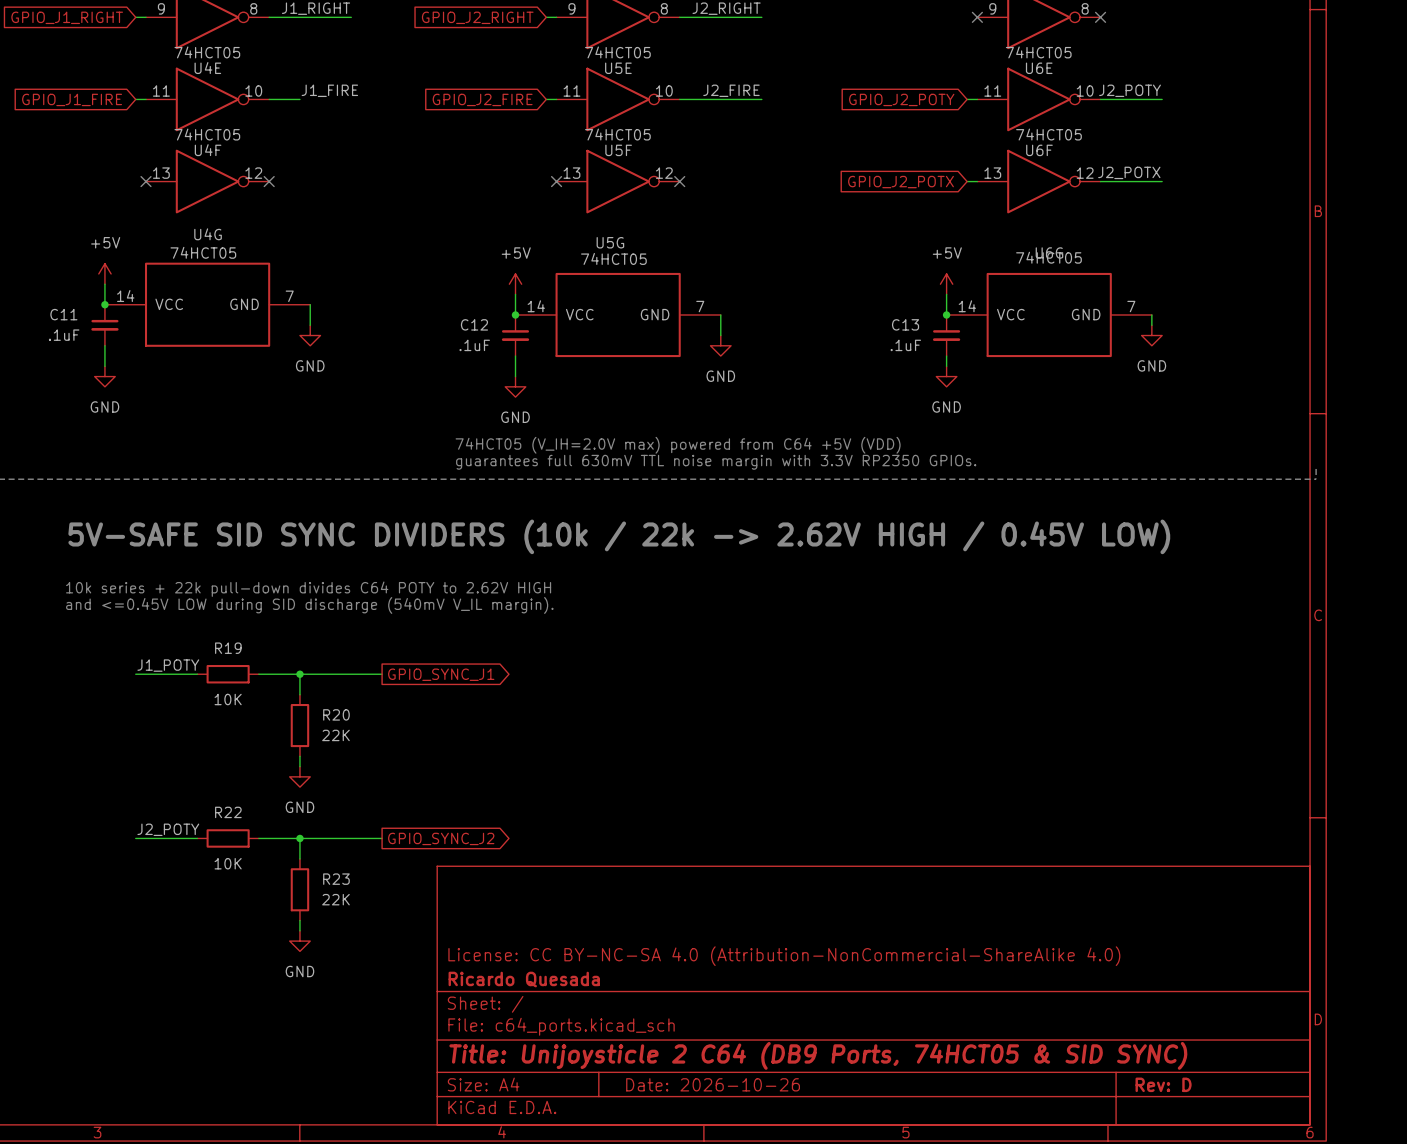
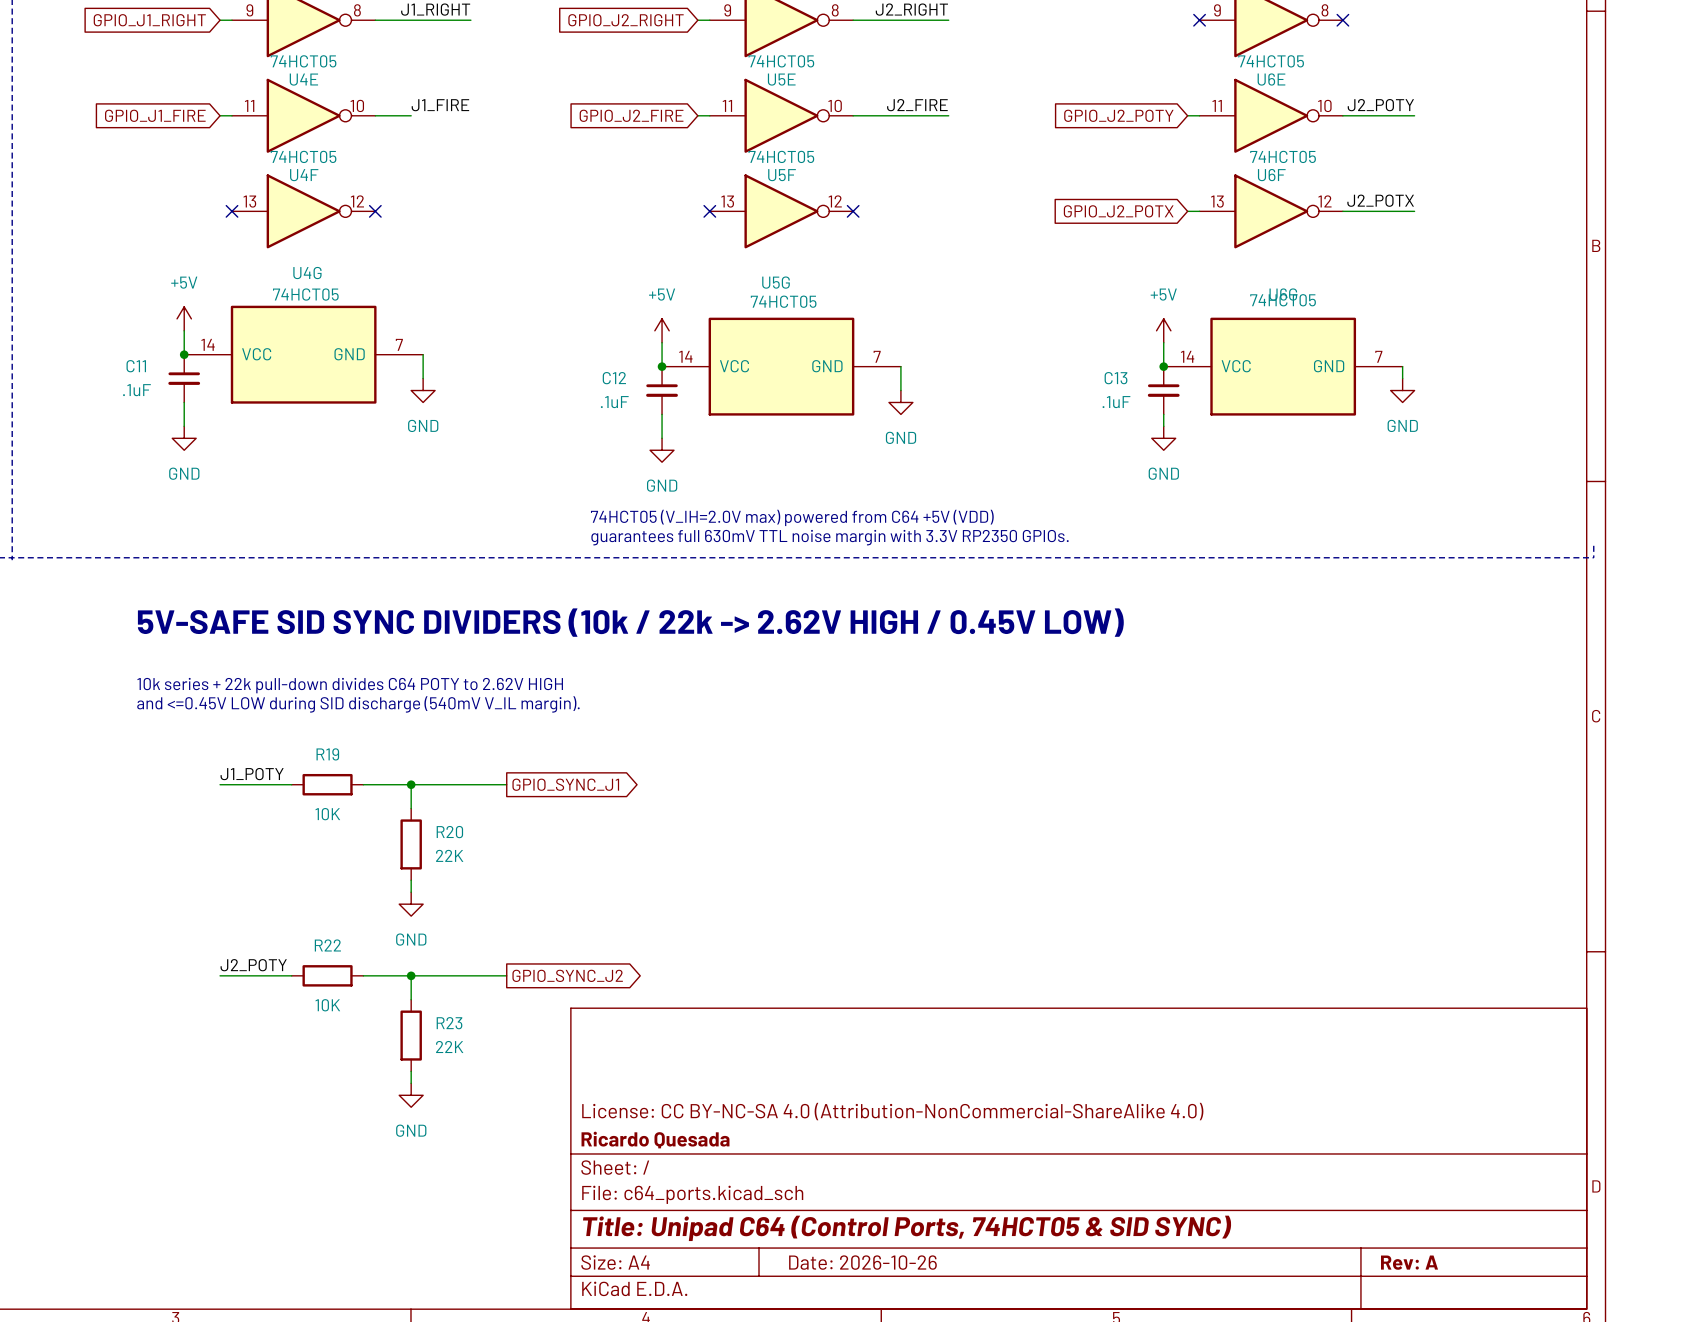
title block: Title: Unijoysticle 2 C64 (DB9 Ports, 74HCT05 & SID SYNC) (818, 1055) -> Title: Unipad C64 (Control Ports, 74HCT05 & SID SYNC) (907, 1228)
title block: Rev: D (1163, 1084) -> Rev: A (1409, 1262)

